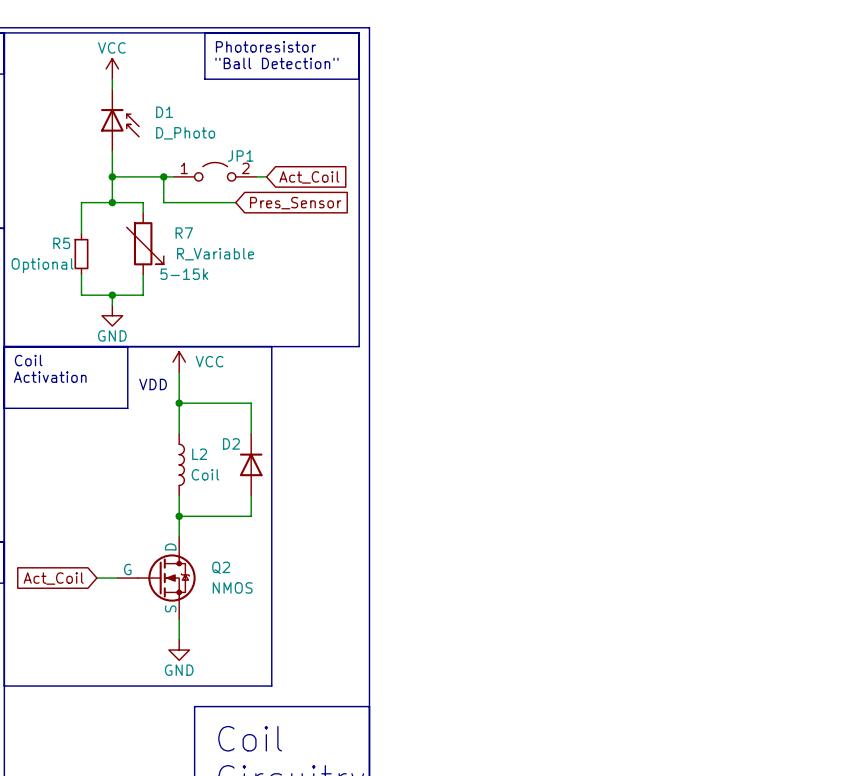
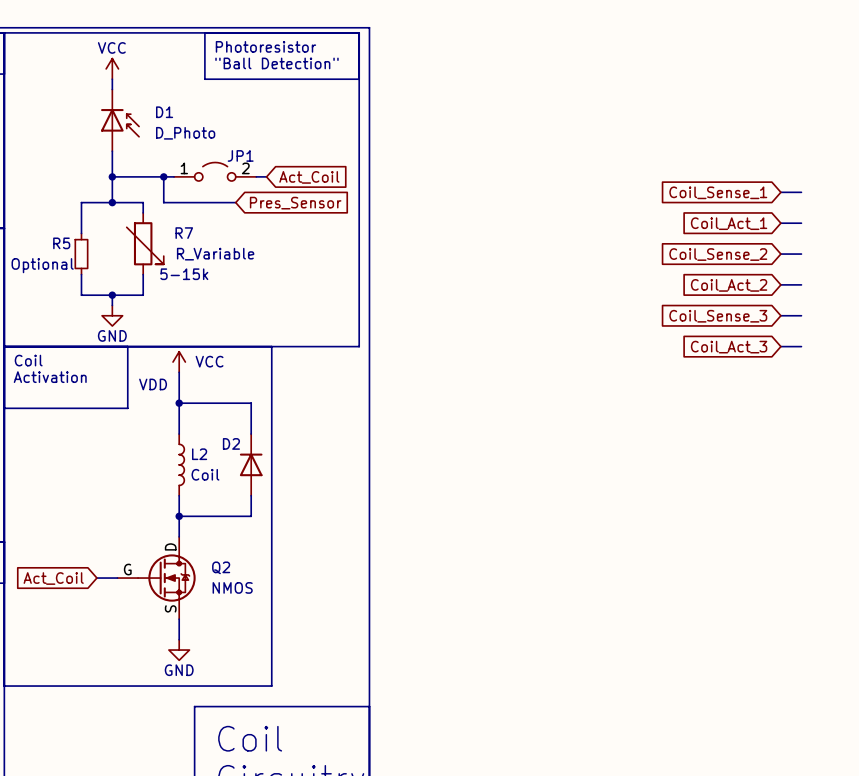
global label: none -> Coil_Sense_1 (718, 192)
wire: none -> (780, 192) (801, 192)
global label: none -> Coil_Act_1 (729, 223)
wire: none -> (780, 223) (801, 223)
global label: none -> Coil_Sense_2 (718, 254)
wire: none -> (780, 254) (801, 254)
wire: none -> (780, 284) (801, 284)
global label: none -> Coil_Act_2 (729, 285)
wire: none -> (780, 315) (801, 315)
global label: none -> Coil_Sense_3 (718, 316)
wire: none -> (780, 346) (801, 346)
global label: none -> Coil_Act_3 (729, 347)

